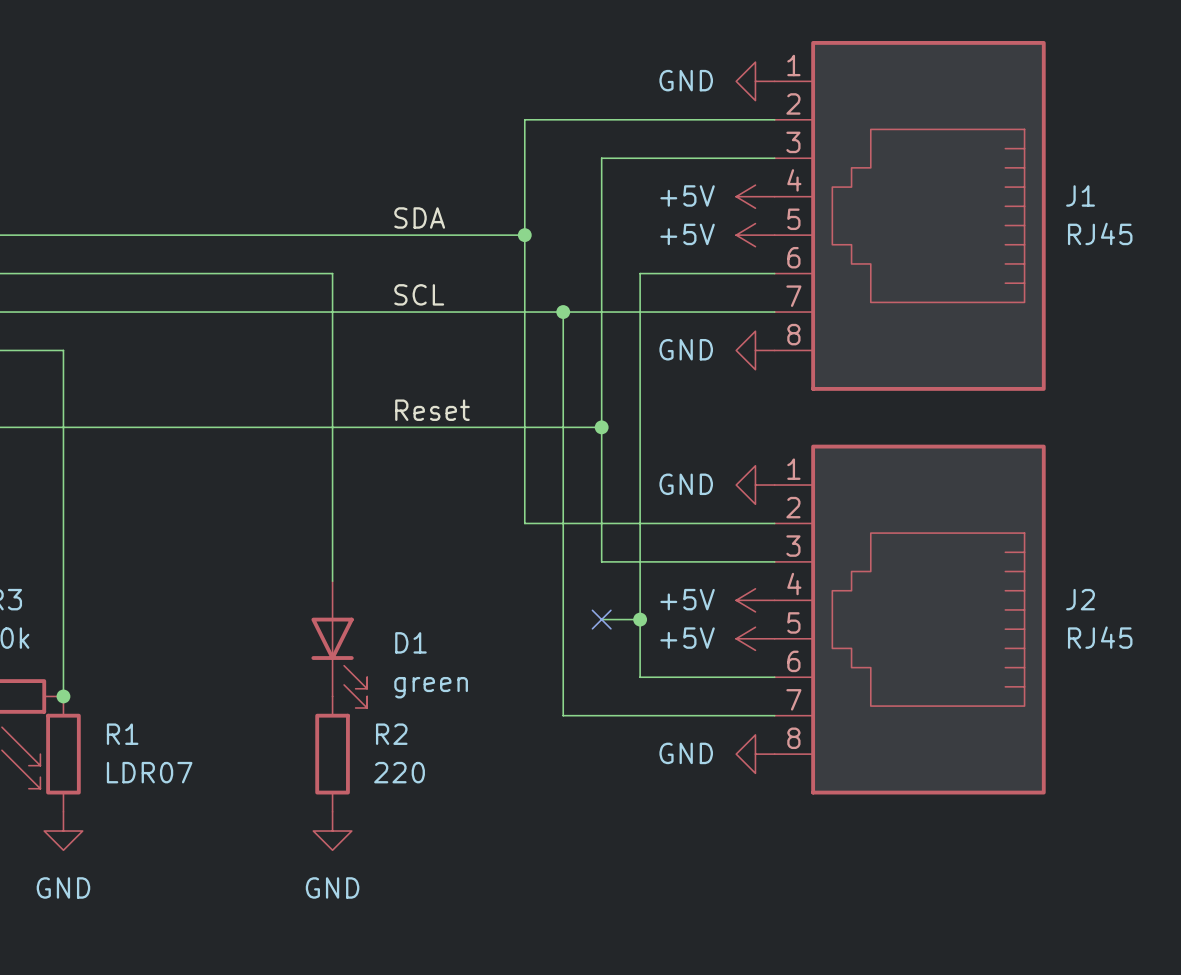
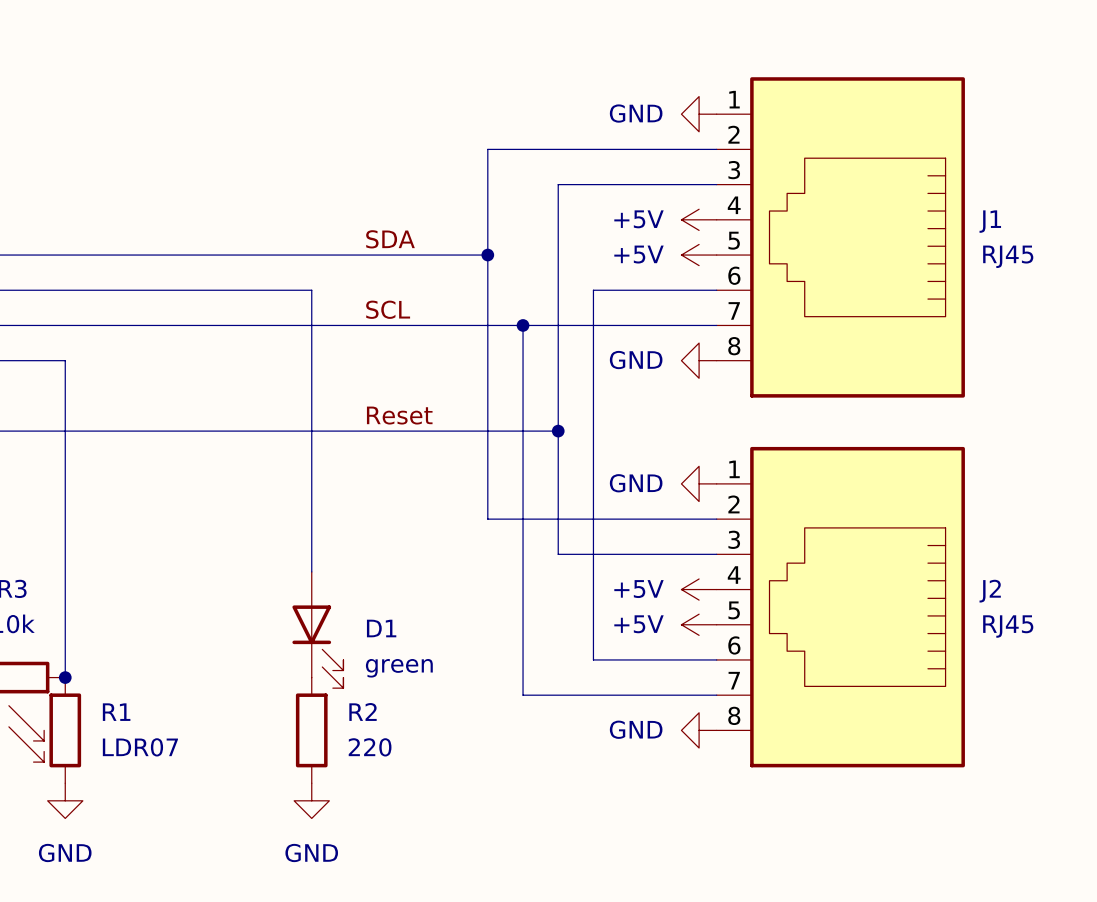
wire: (601, 619) (640, 619) -> none
no-connect mark: (601, 619) -> none
junction: (640, 619) -> none

